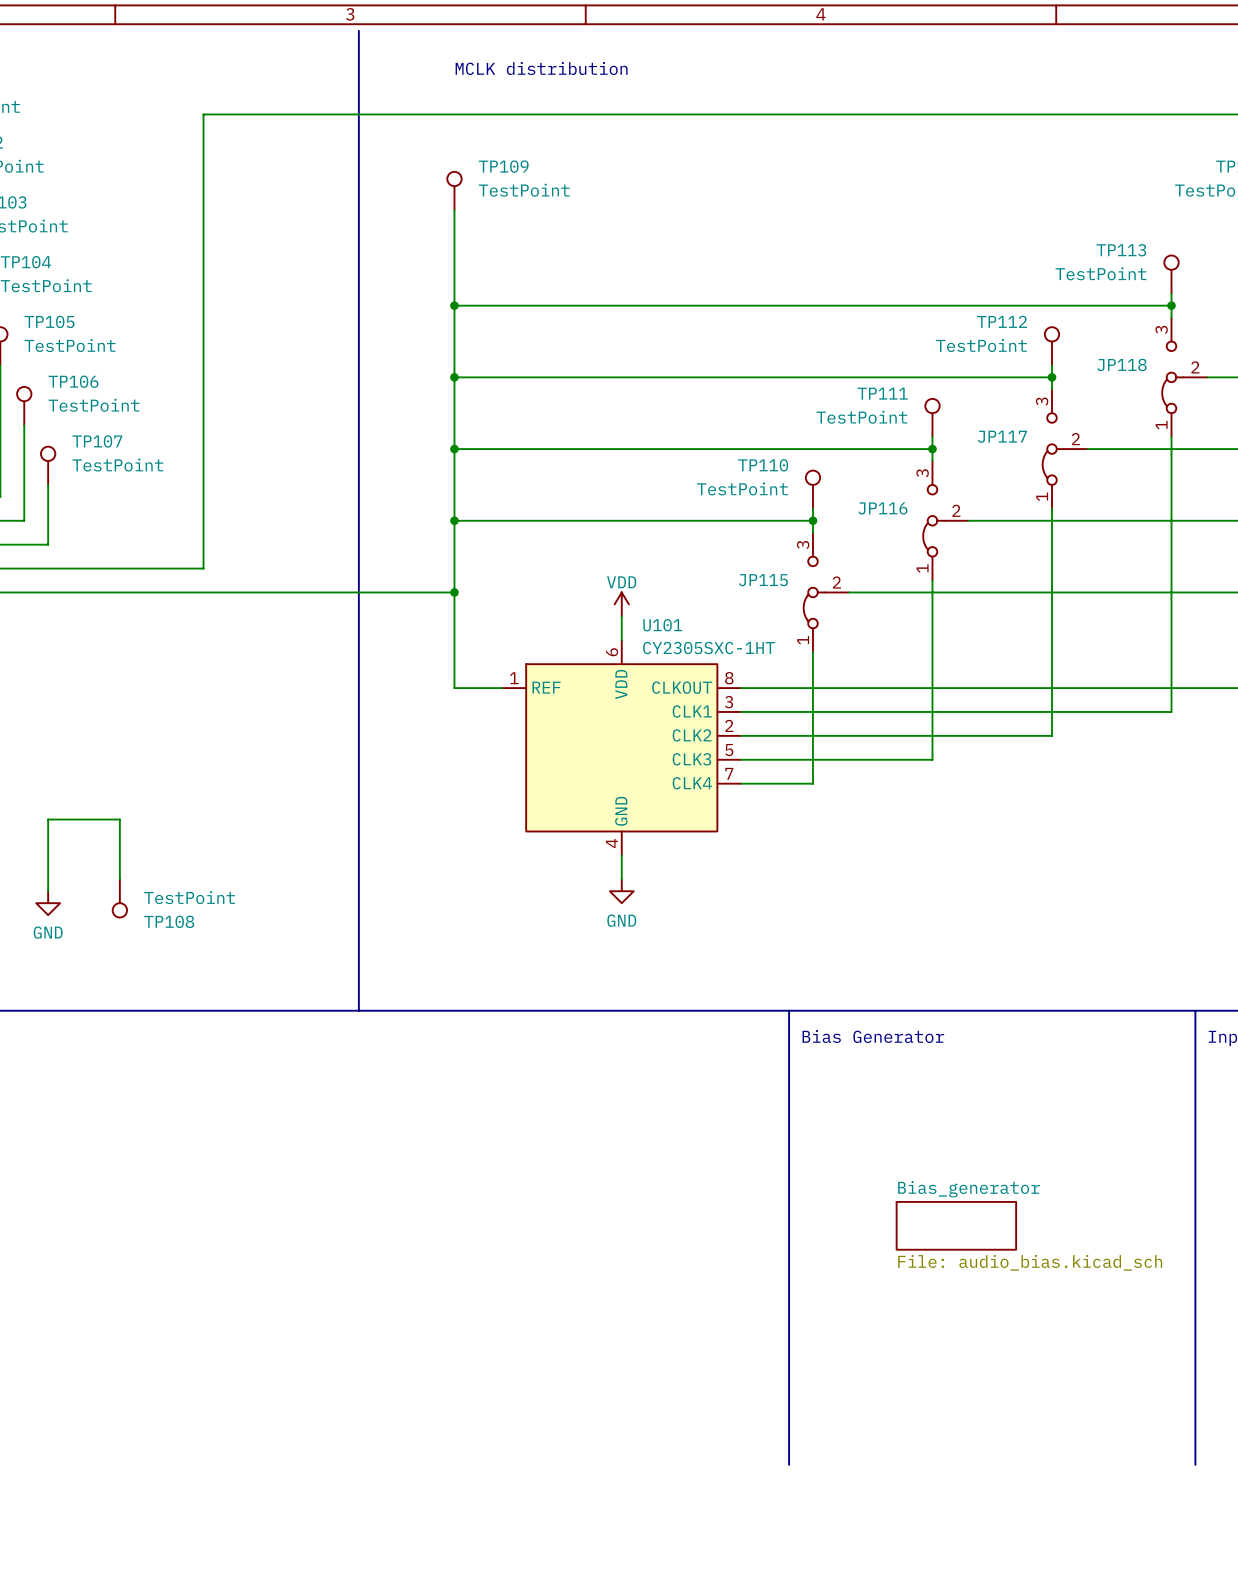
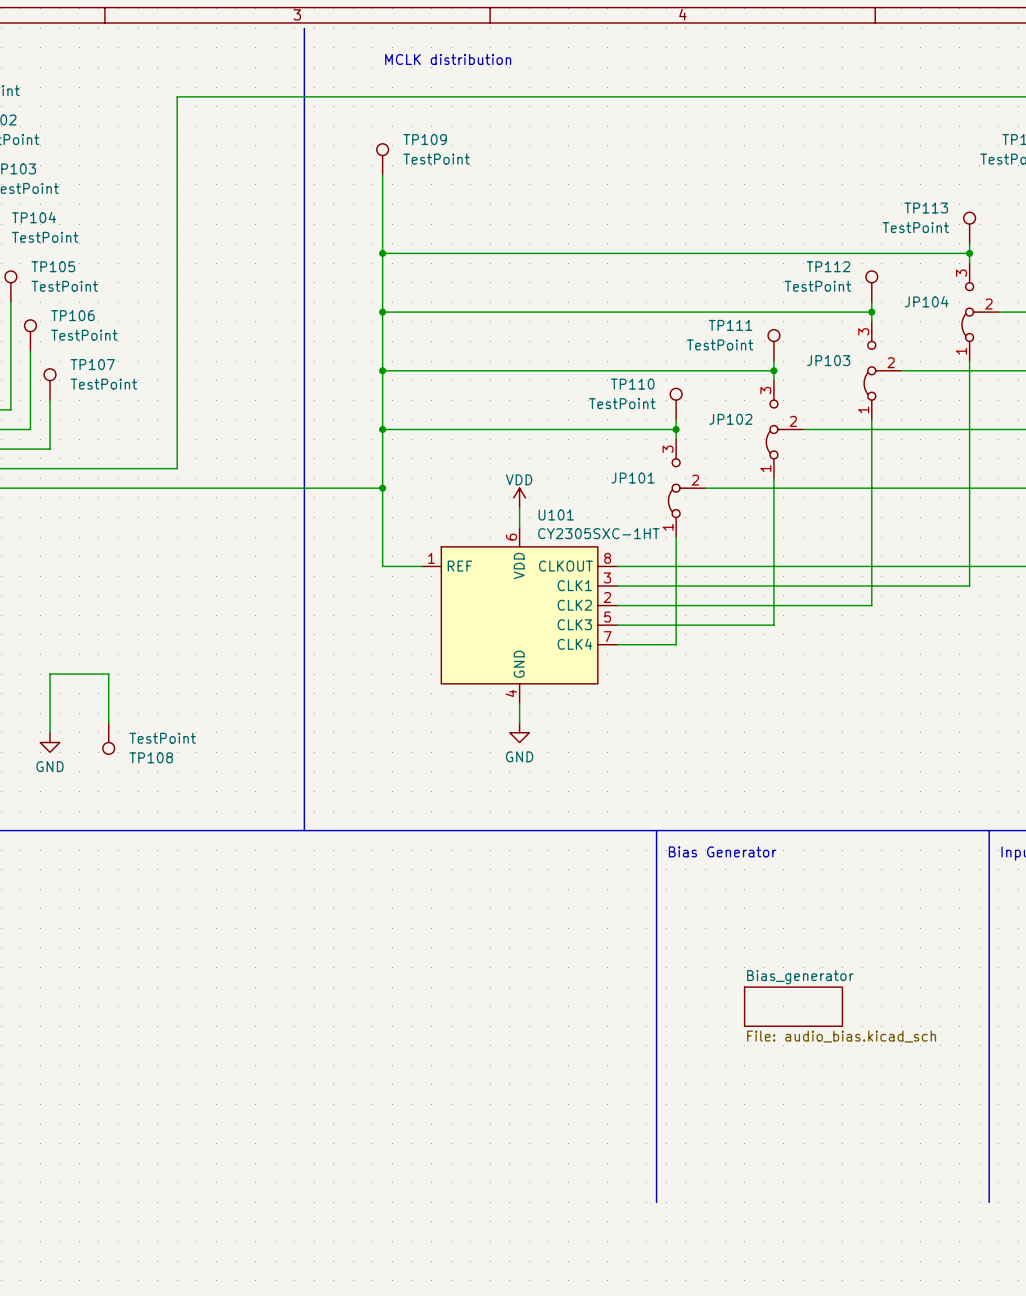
JP118 name: JP118 (1122, 364) -> JP104 (926, 301)
JP117 name: JP117 (1002, 436) -> JP103 (828, 360)
JP116 name: JP116 (882, 508) -> JP102 (730, 419)
JP115 name: JP115 (763, 580) -> JP101 (632, 478)

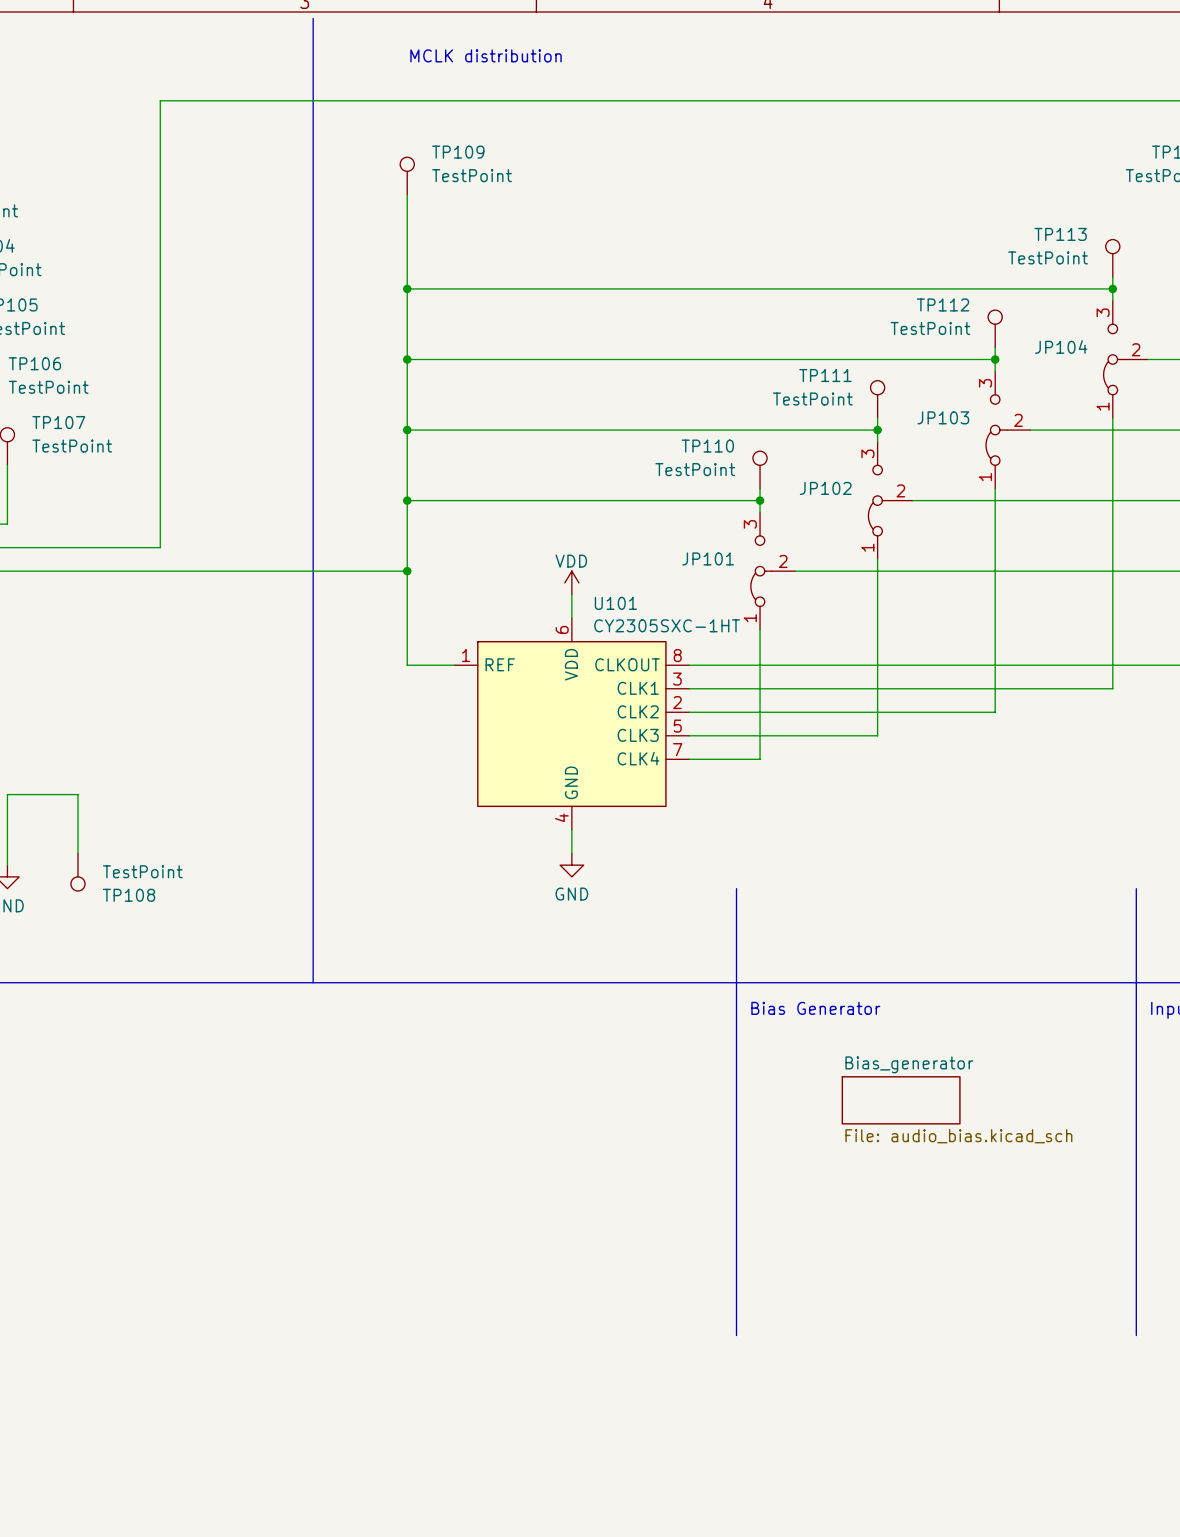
line: none -> (736, 888) (736, 982)
line: none -> (1136, 888) (1136, 982)
sheet Bias_generator position: (793, 1006) -> (901, 1100)
line: (656, 1124) (656, 1202) -> none
line: (989, 1124) (989, 1202) -> none

